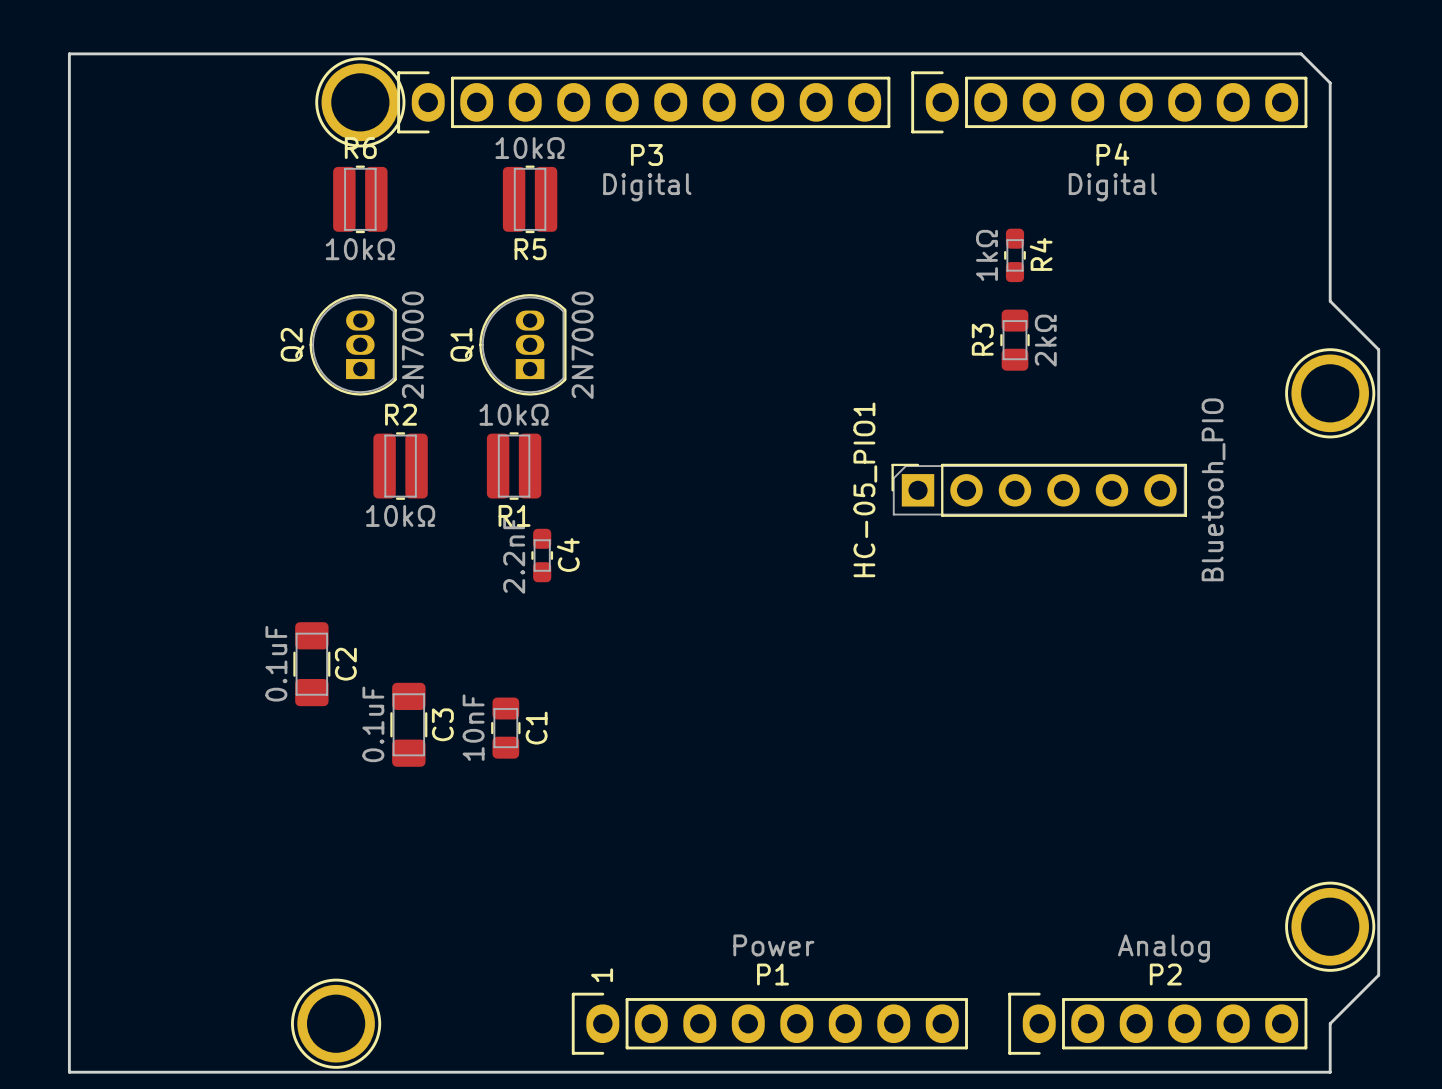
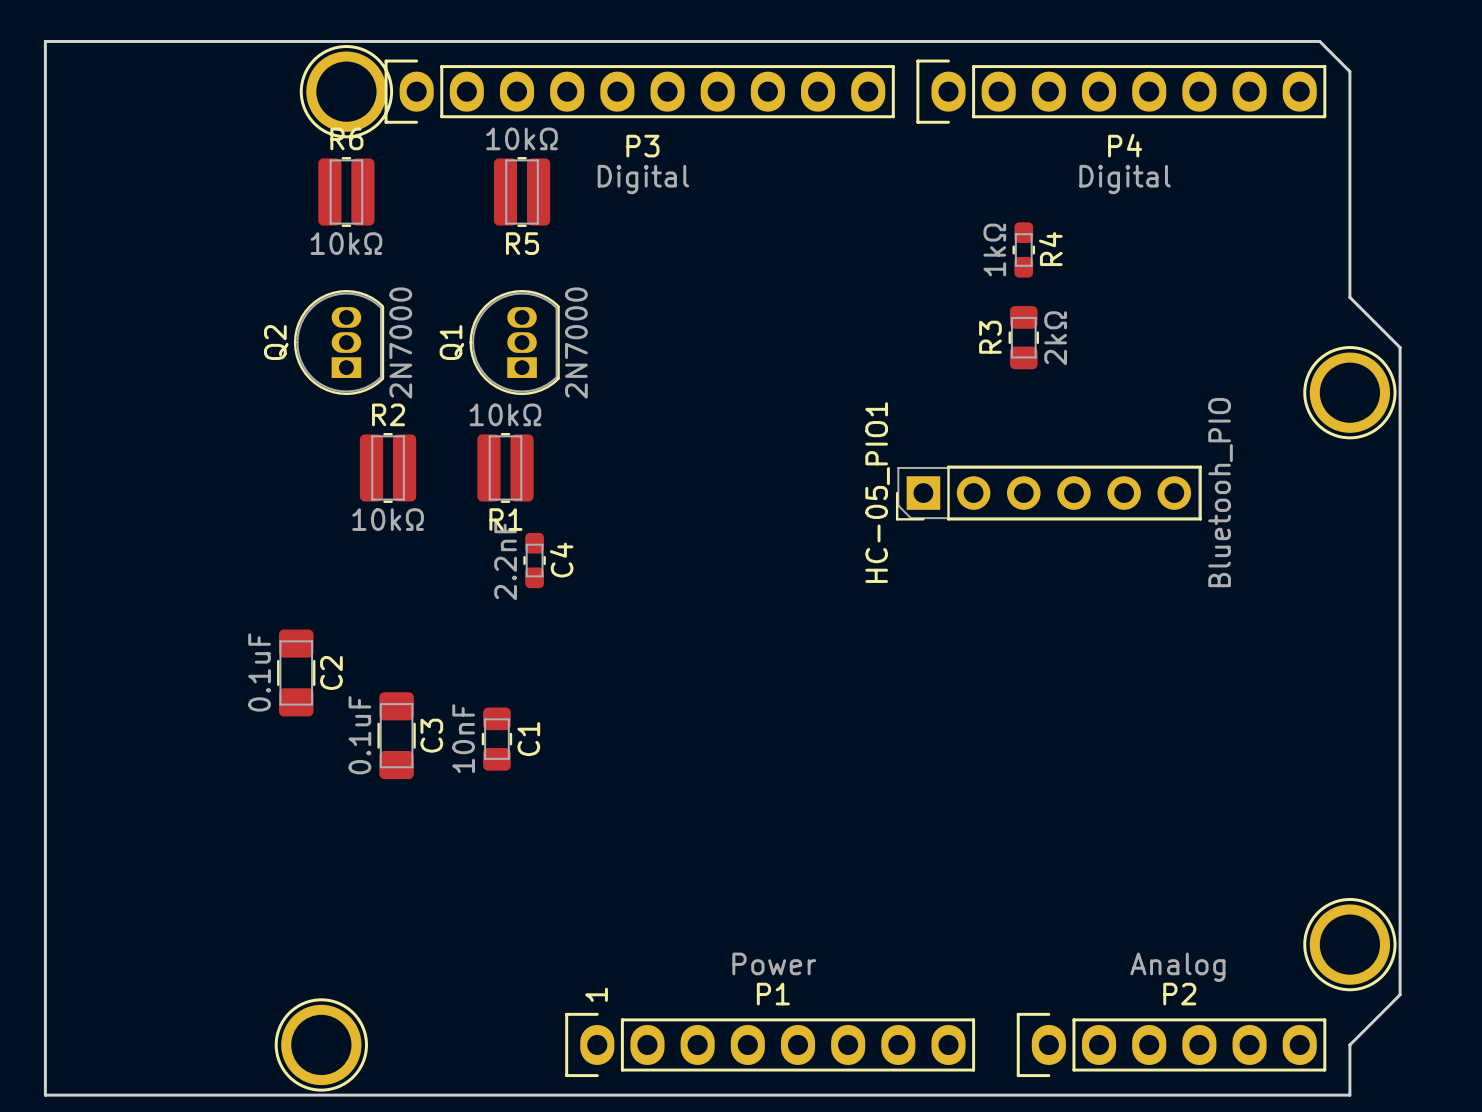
HC-05_PIO1 footprint: [891, 463, 1188, 517] -> [895, 465, 1202, 521]

